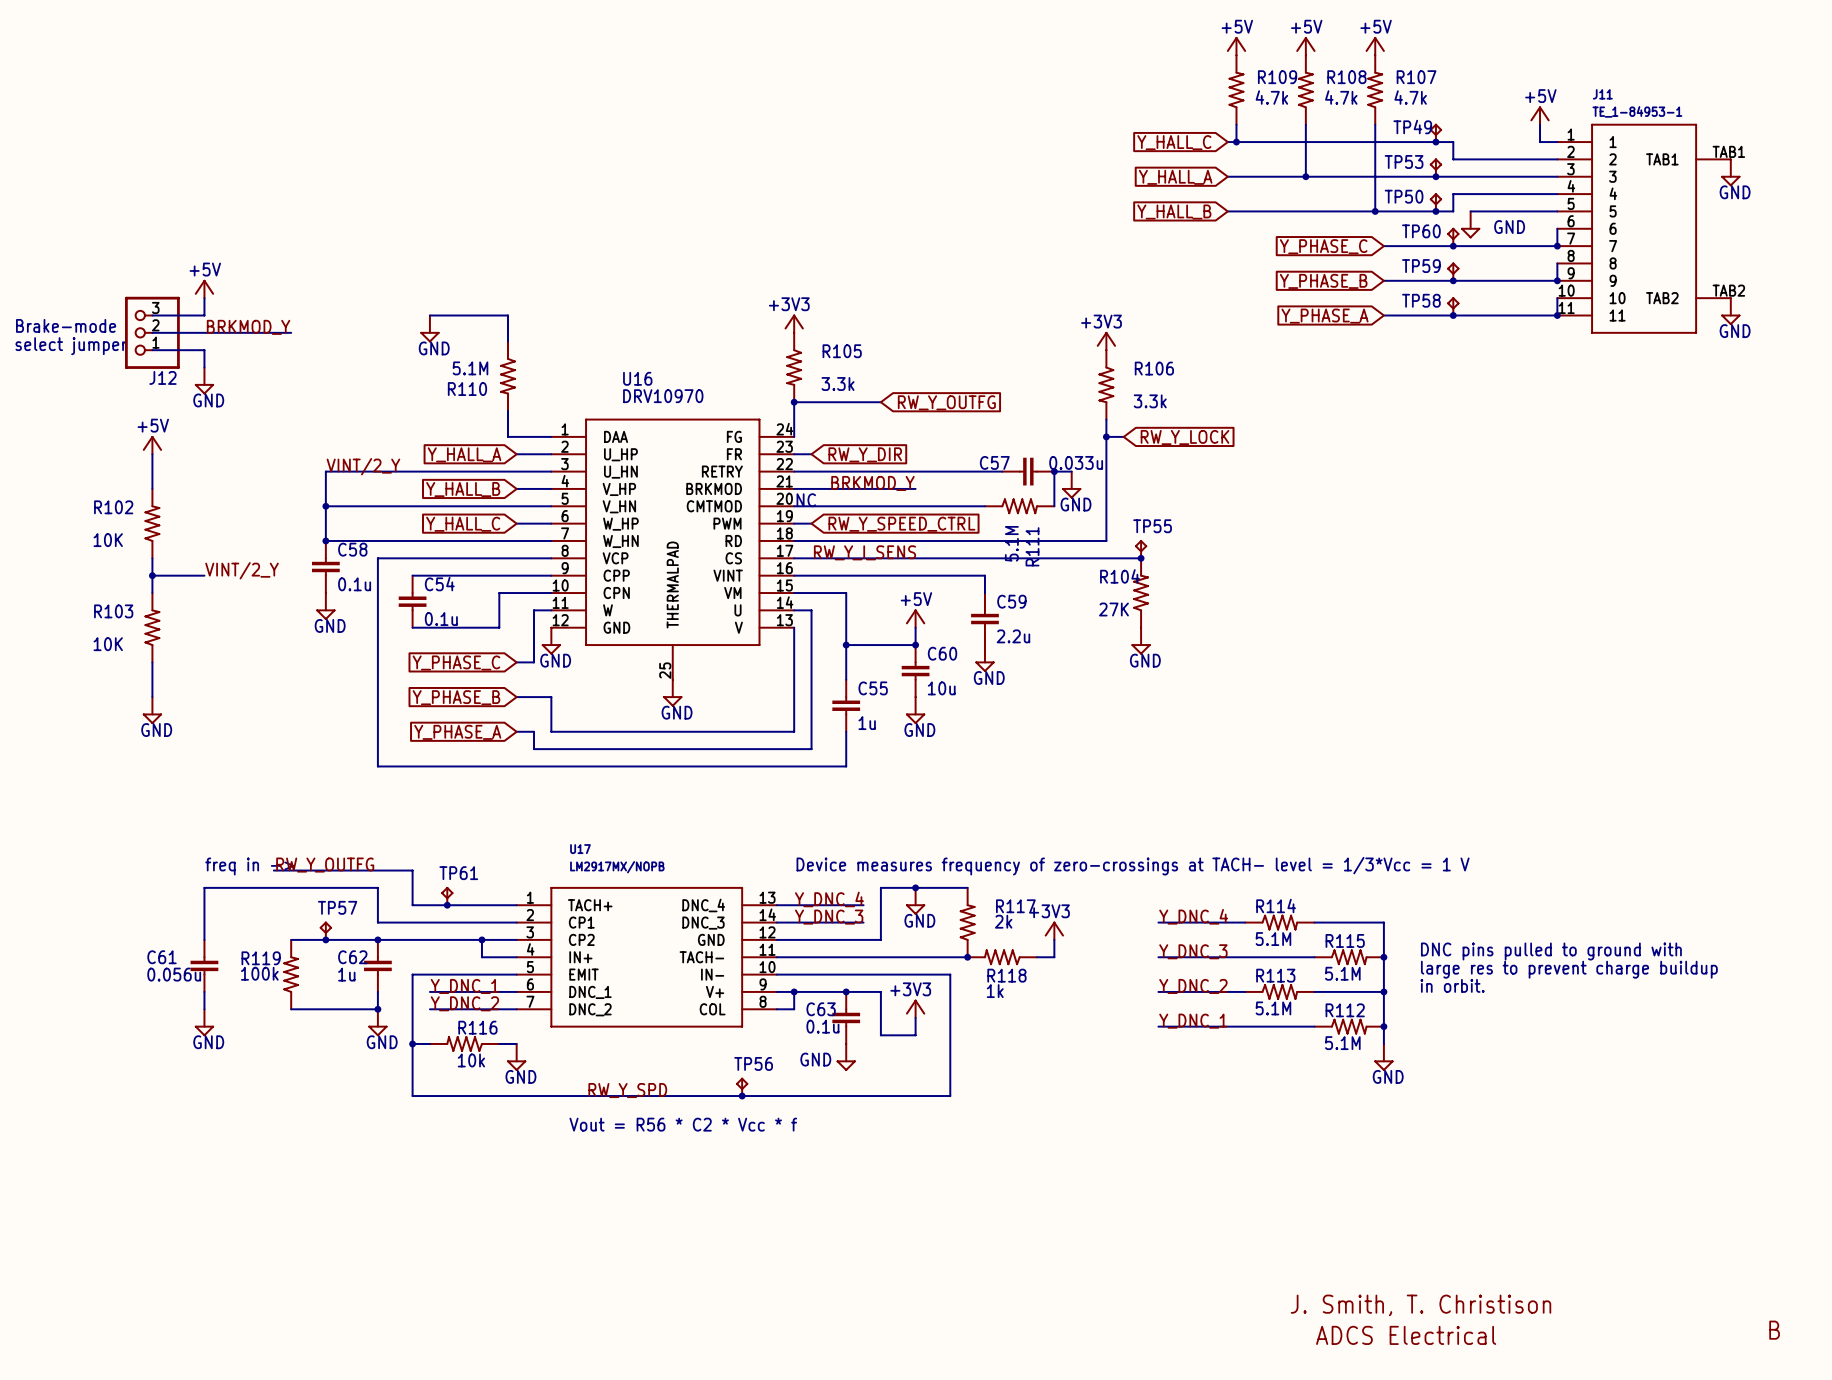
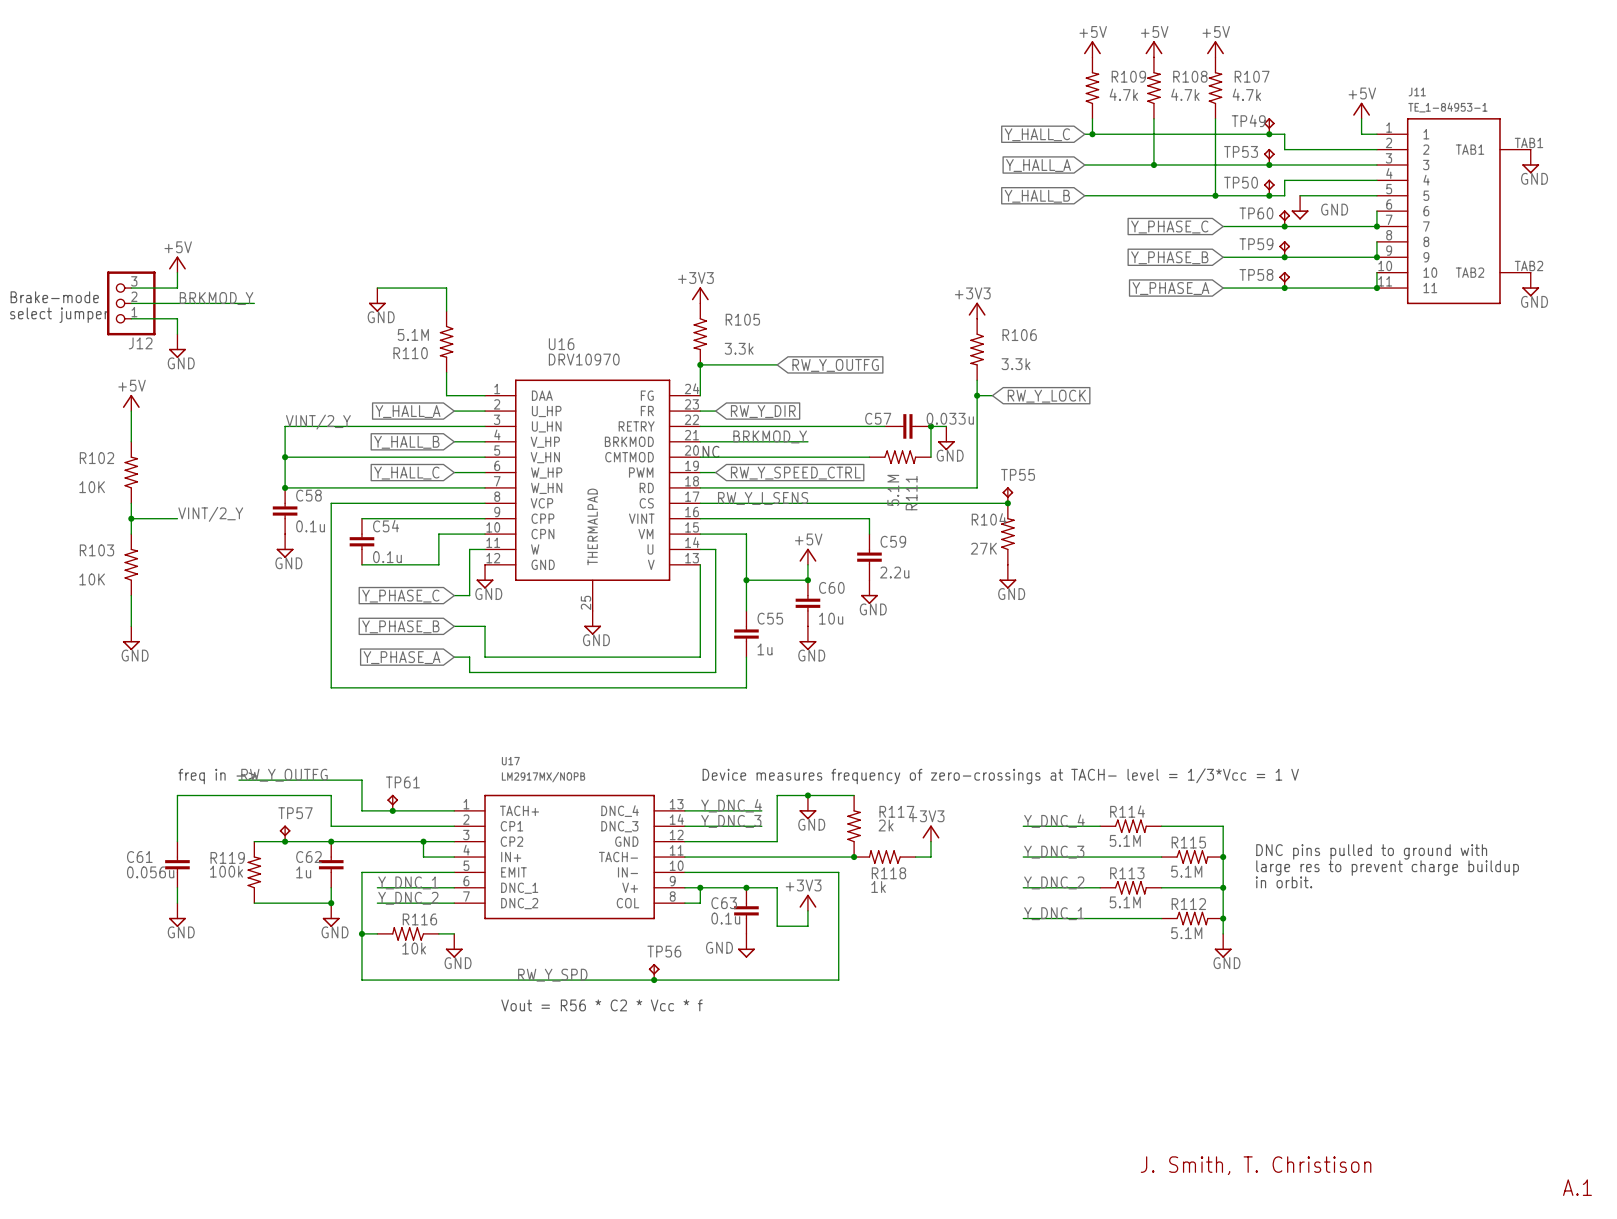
text: B (1774, 1330) -> A.1 (1577, 1187)
text: ADCS Electrical (1406, 1335) -> none

